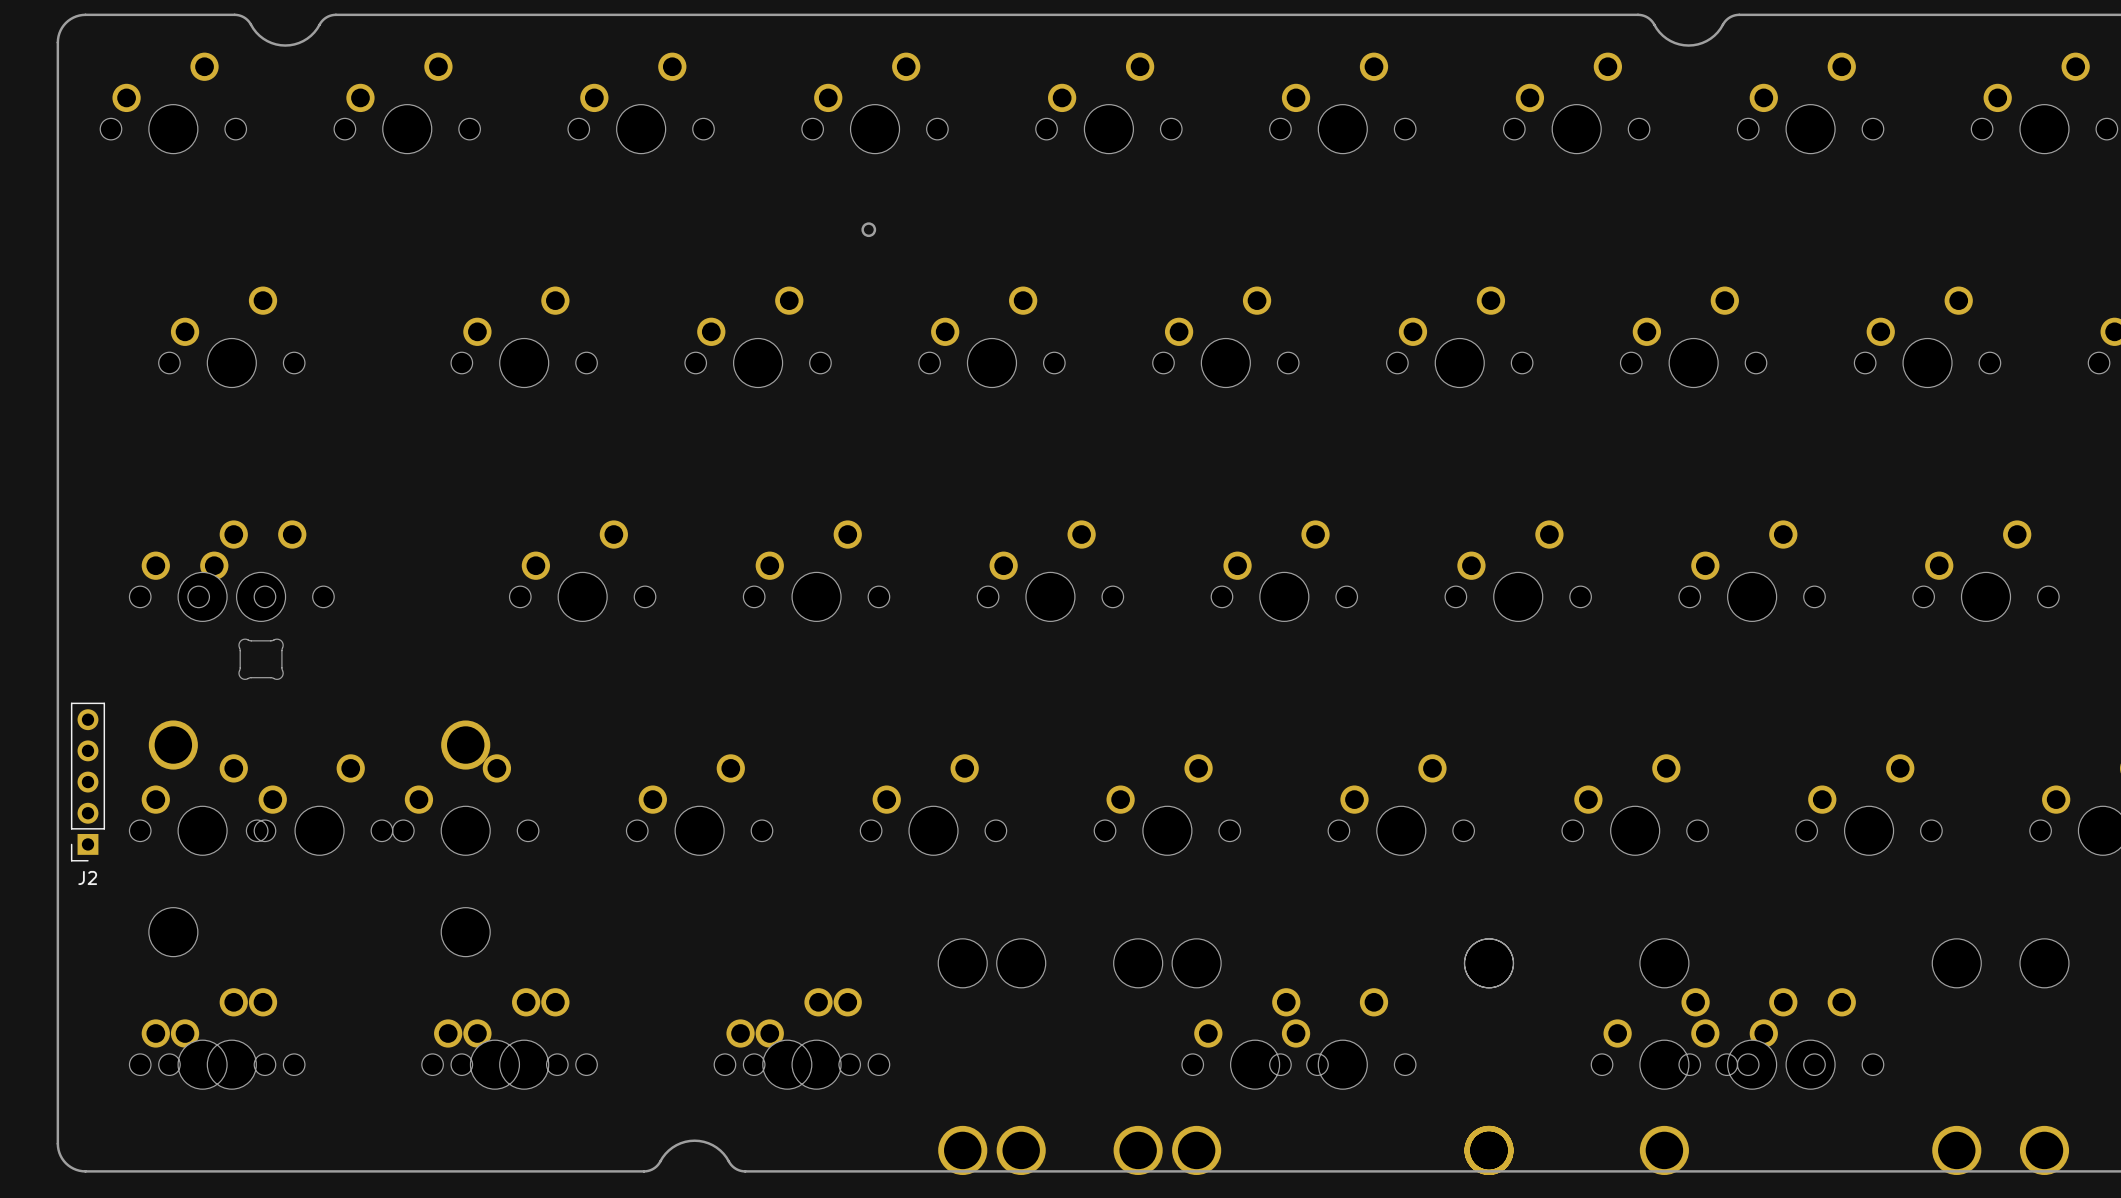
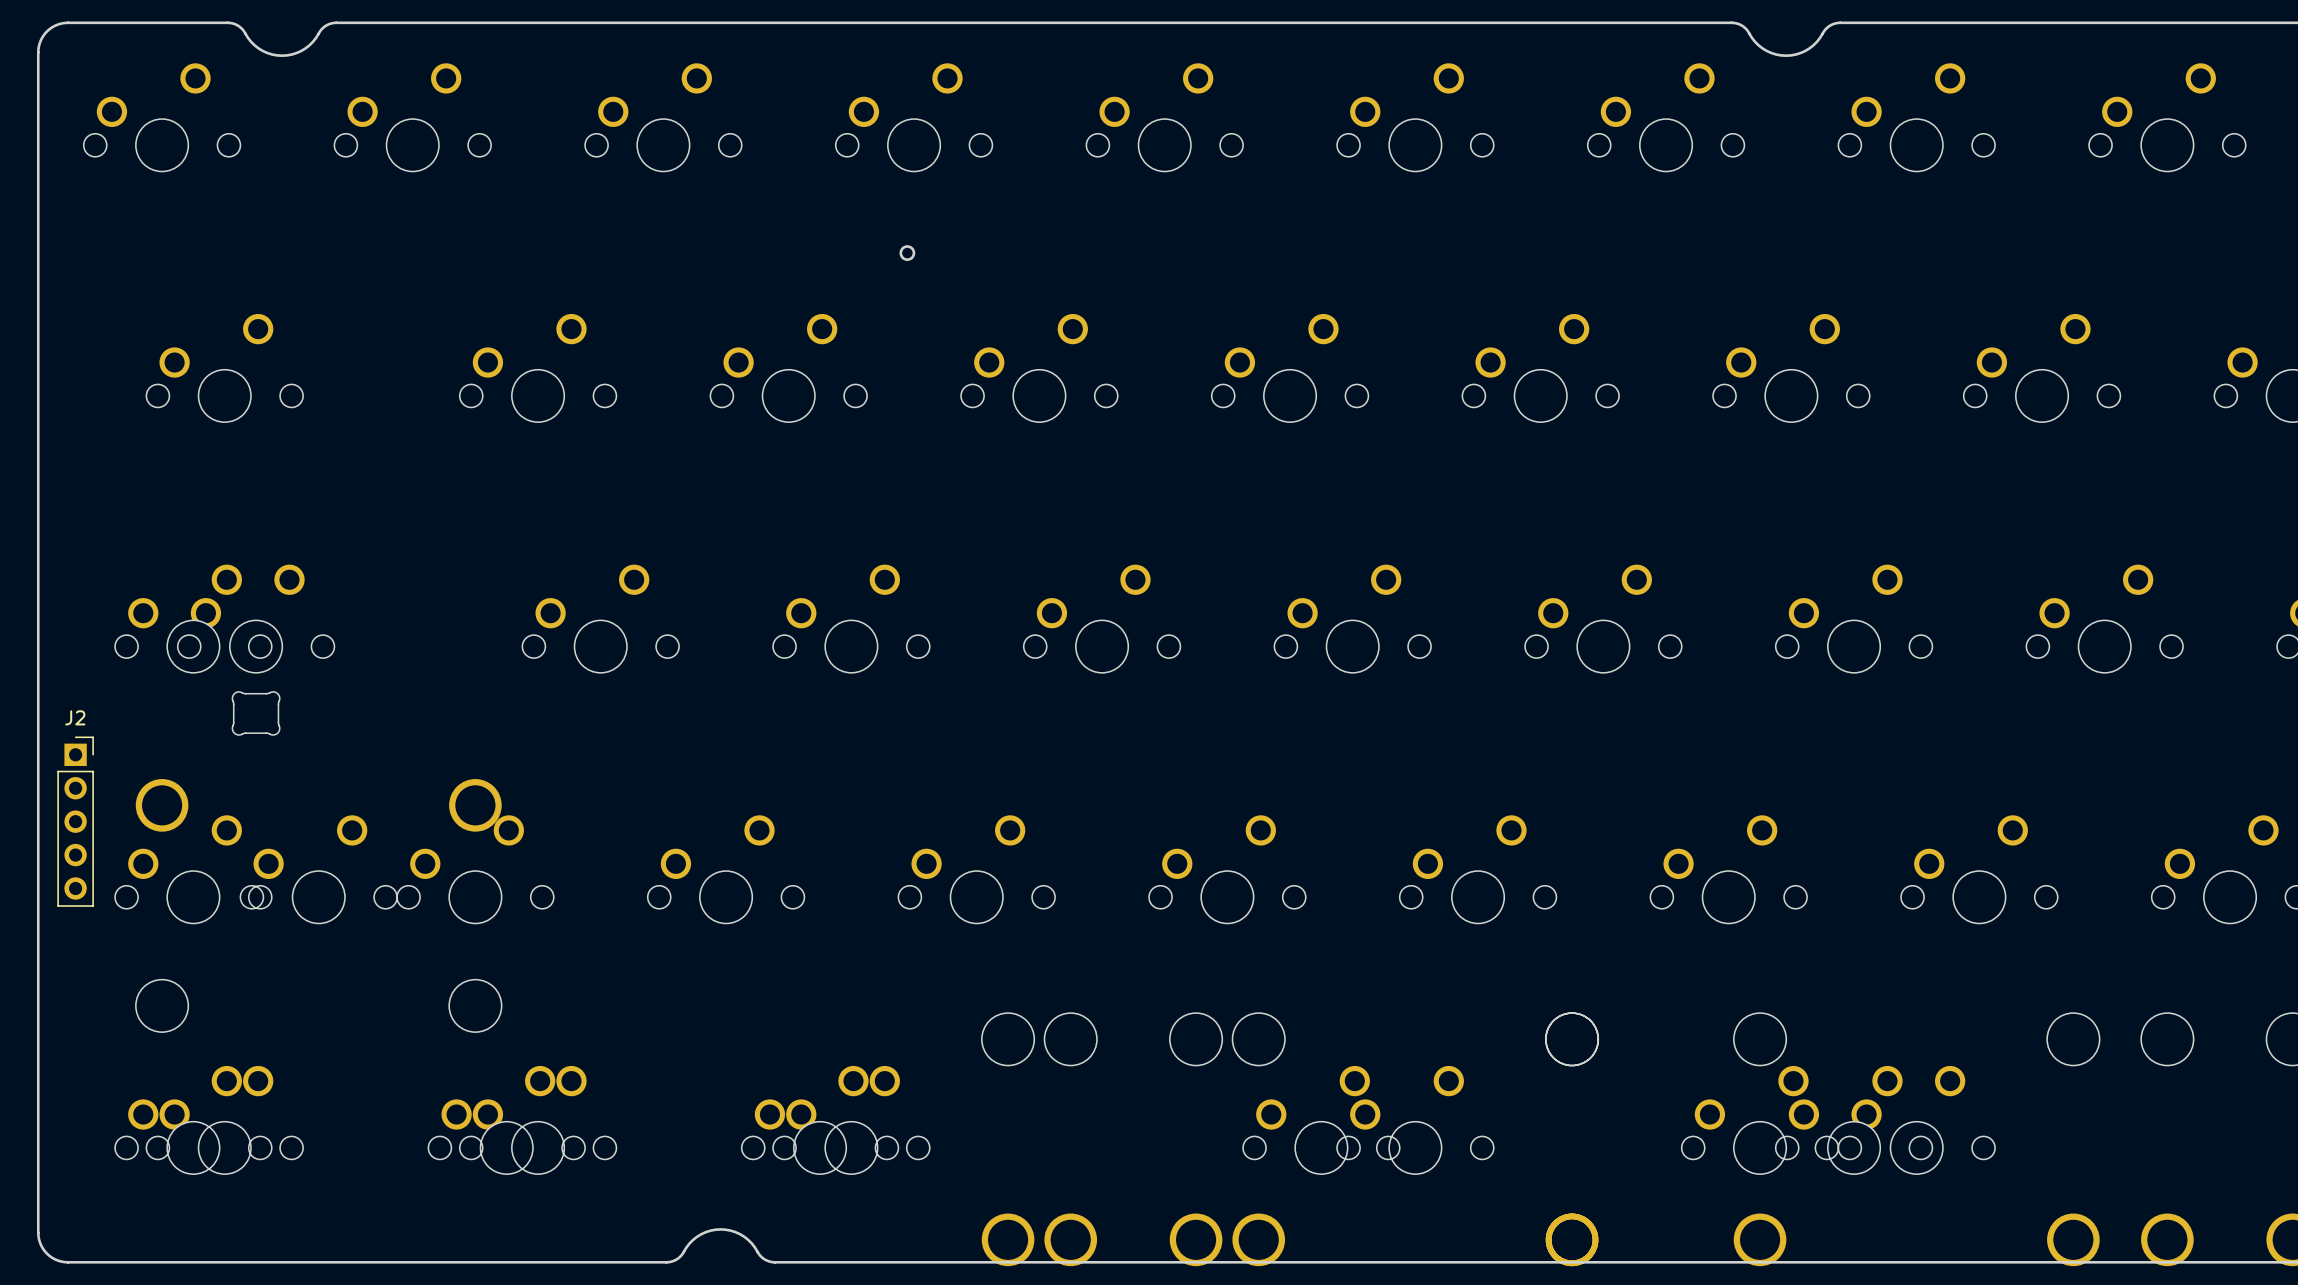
J2 rotation: 0° (87, 782) -> 180° (75, 821)

